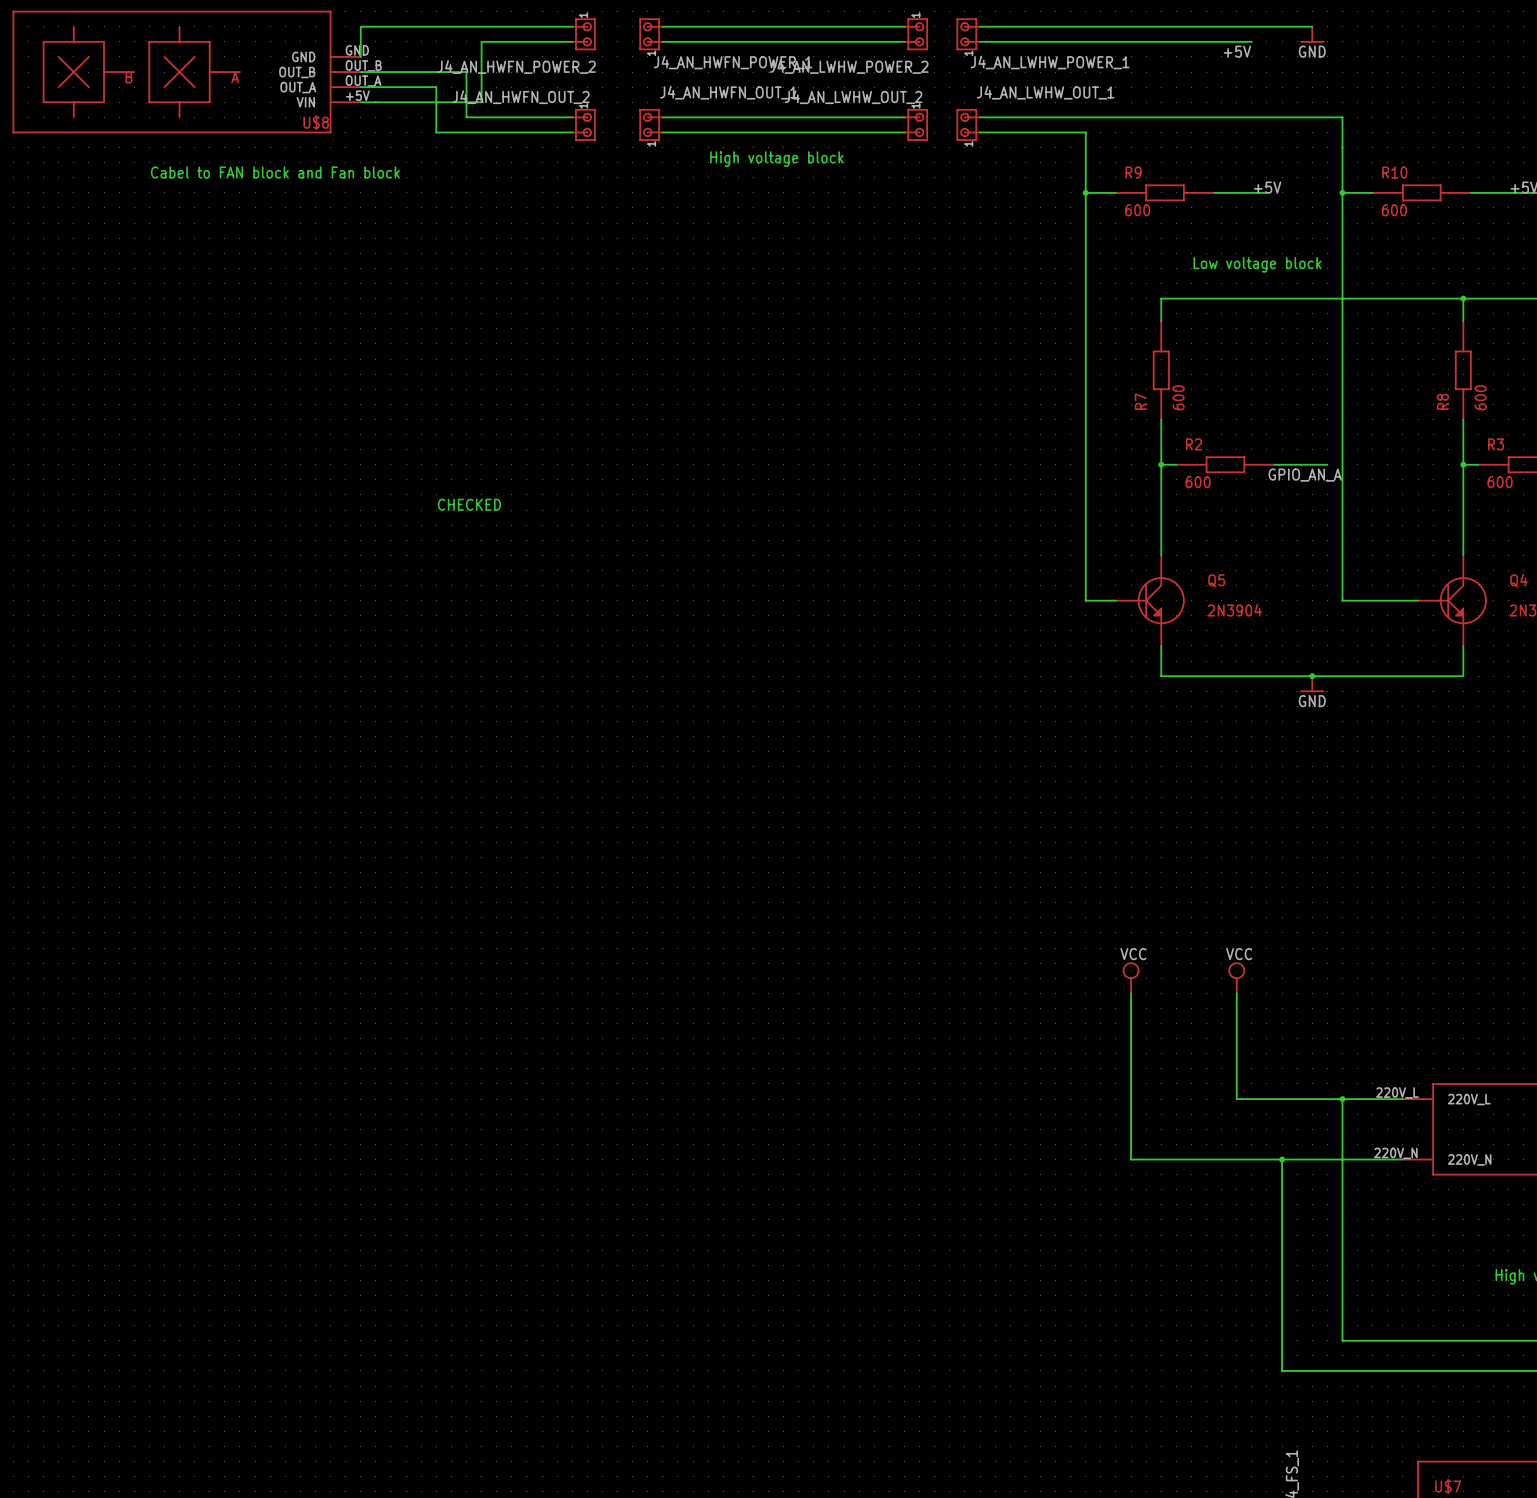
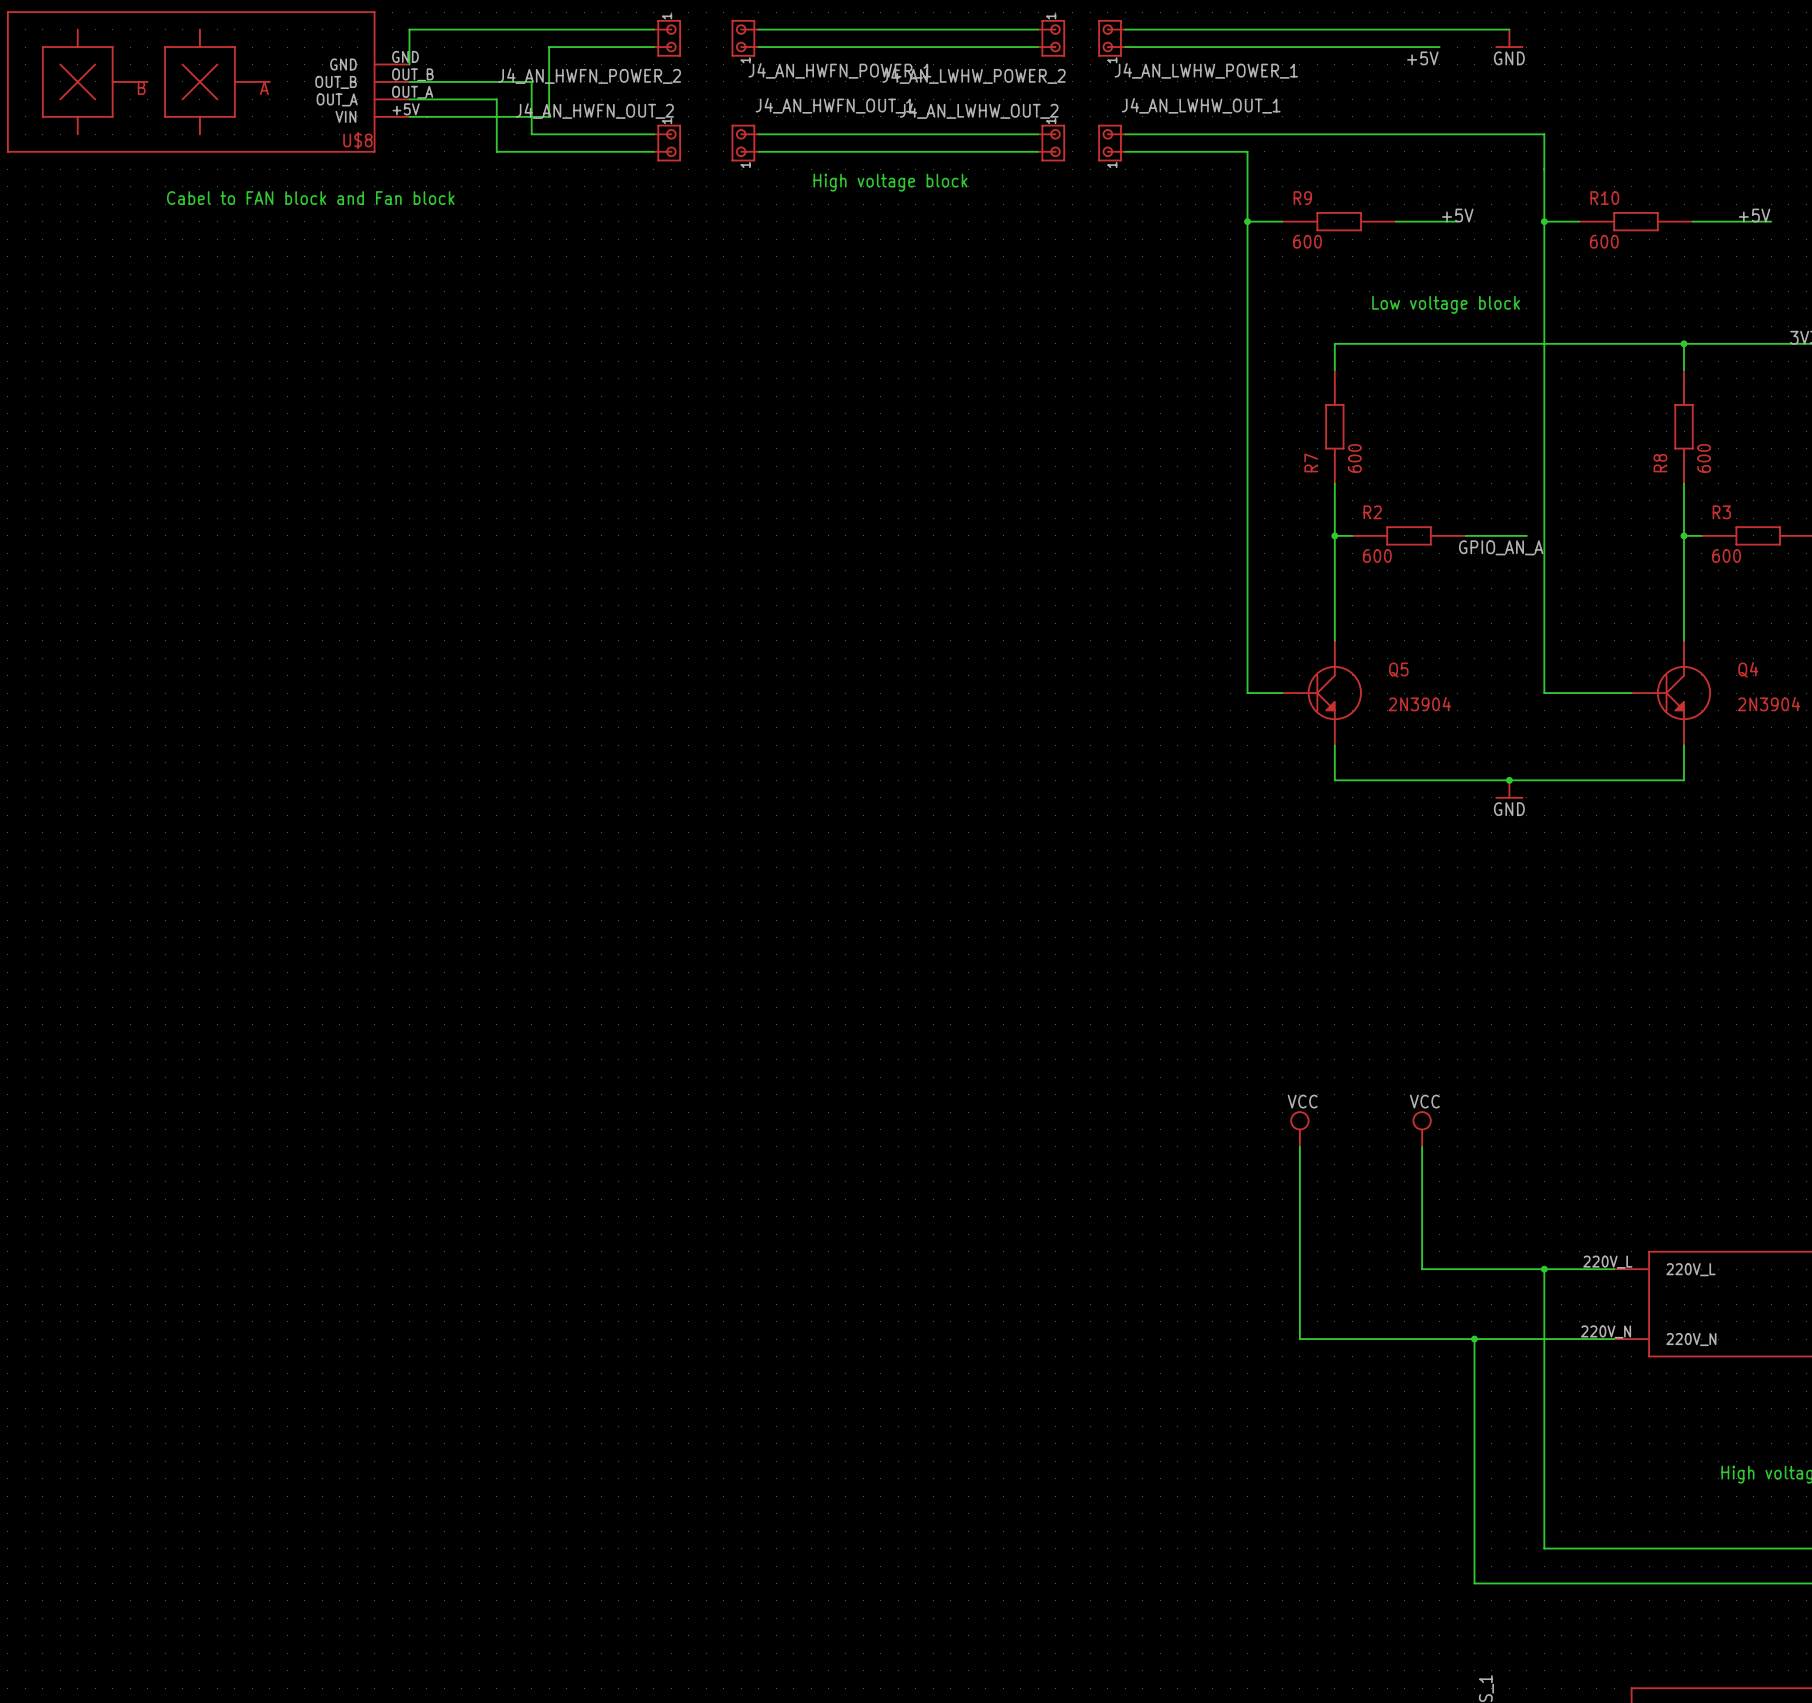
text: CHECKED (469, 504) -> none

